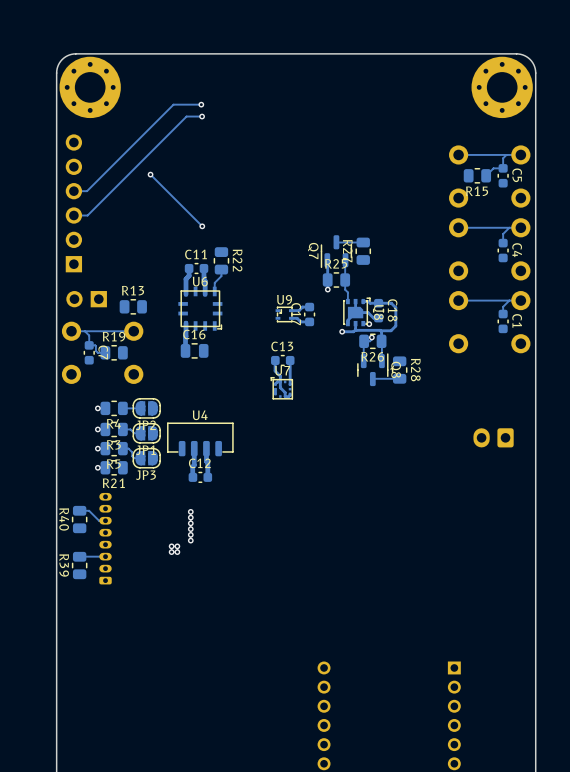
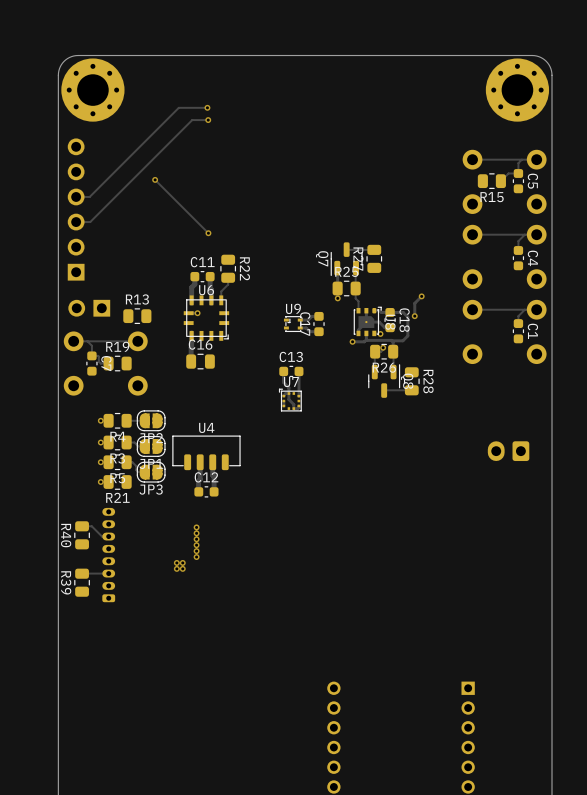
track: none -> (421, 296) (414, 303) (414, 316)
via: none -> (421, 296)
via: none -> (197, 313)
via: none -> (414, 316)

